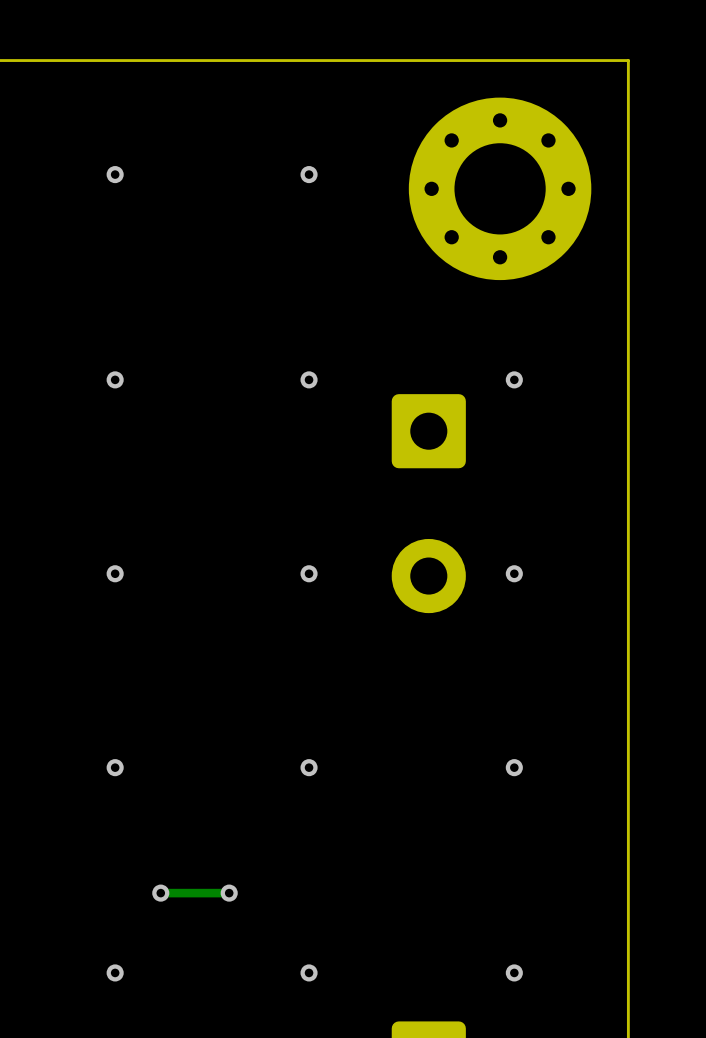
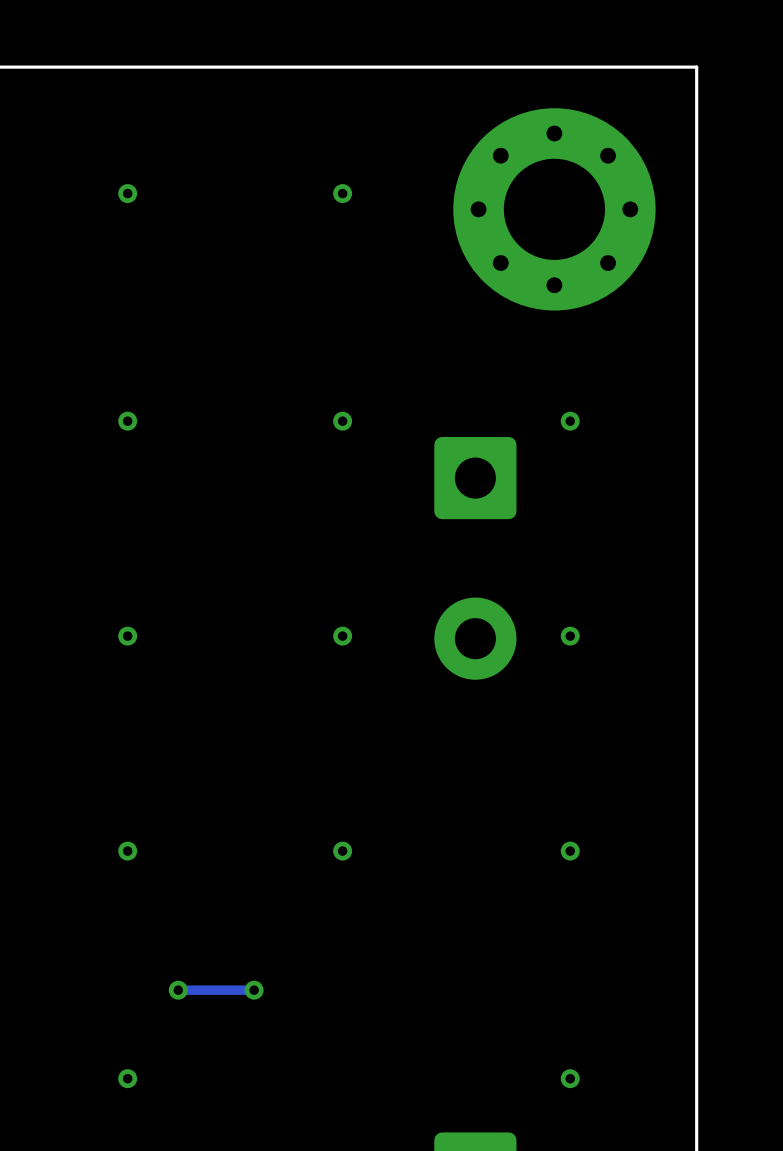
via: (309, 972) -> none

